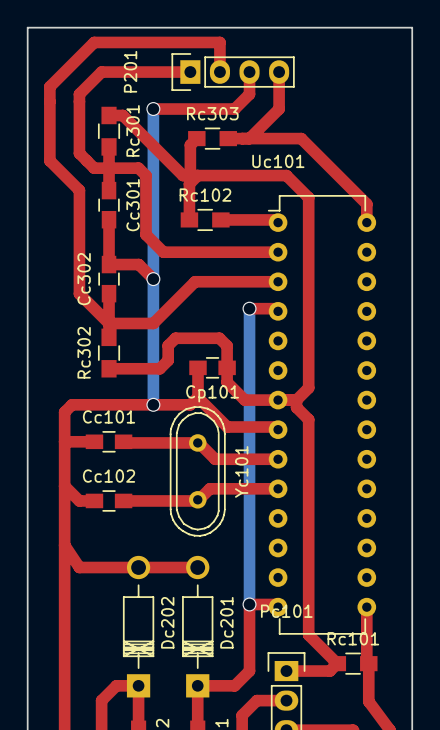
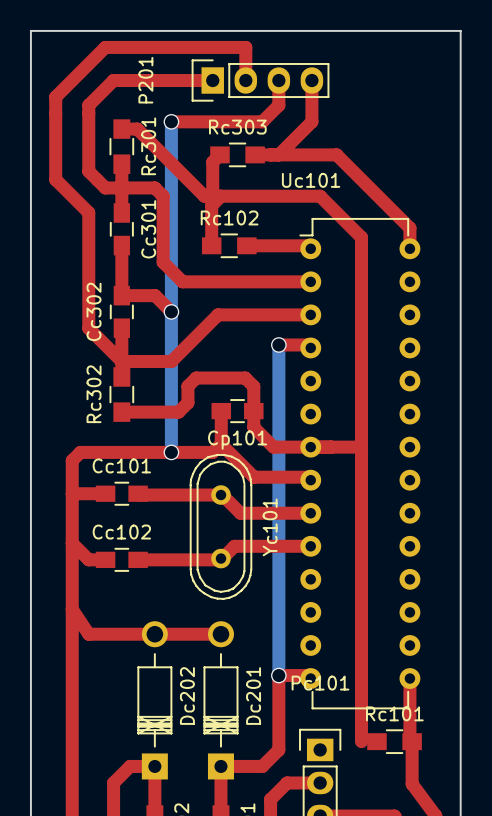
top track: (308, 197) (308, 387) (296, 400) (296, 407) (308, 419) (308, 635) (337, 663) (329, 671) (286, 671) -> (344, 221) (361, 237) (361, 741)
top track: none -> (331, 447) (361, 447)

